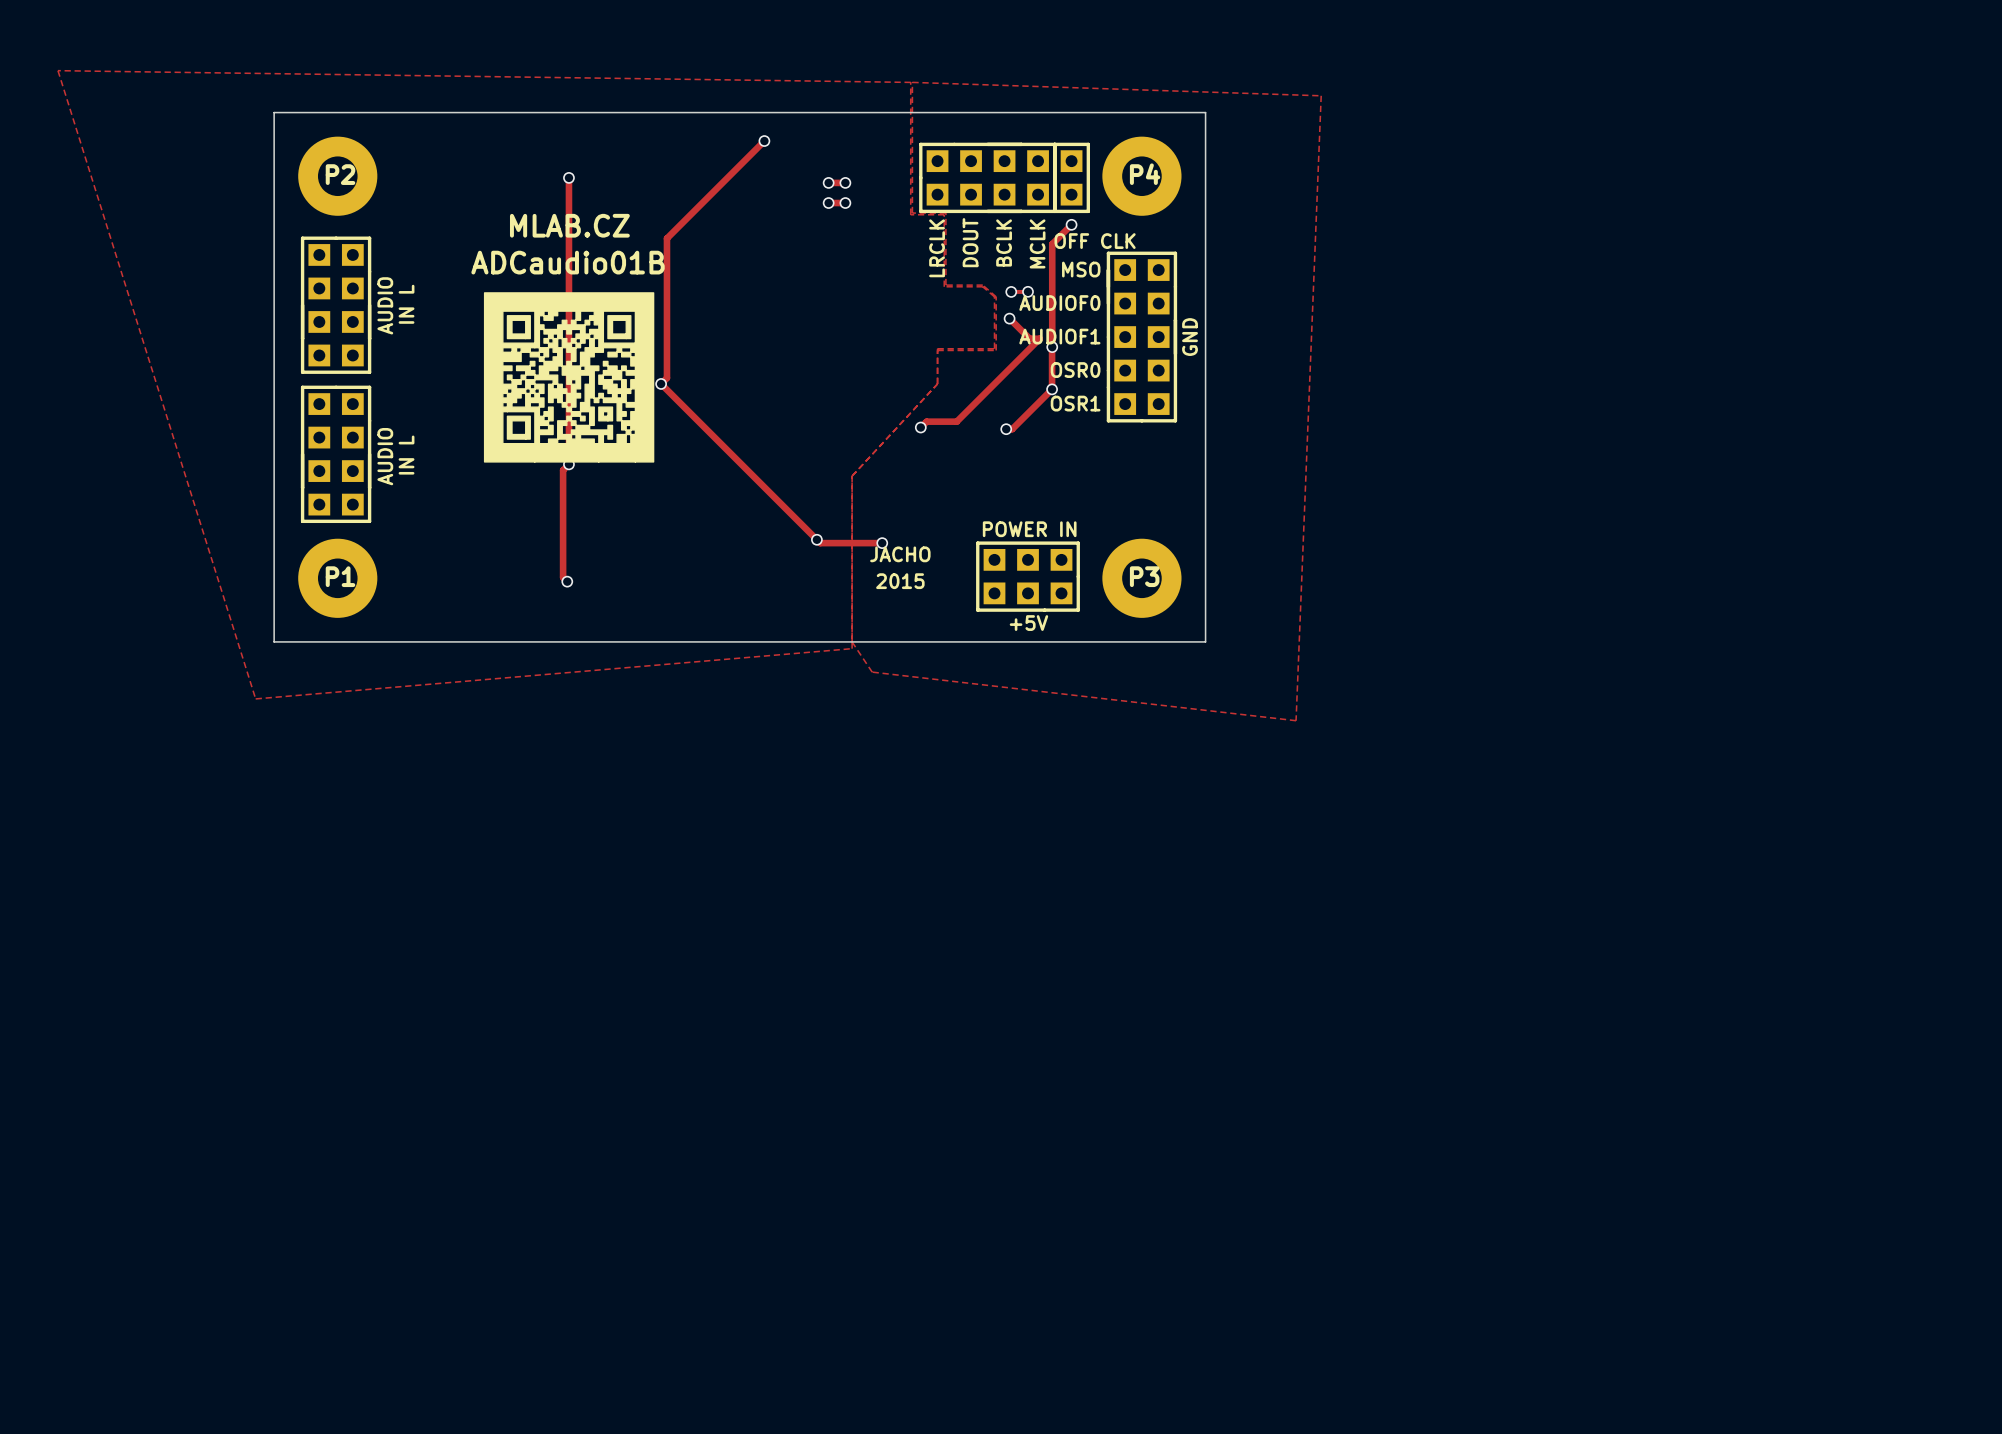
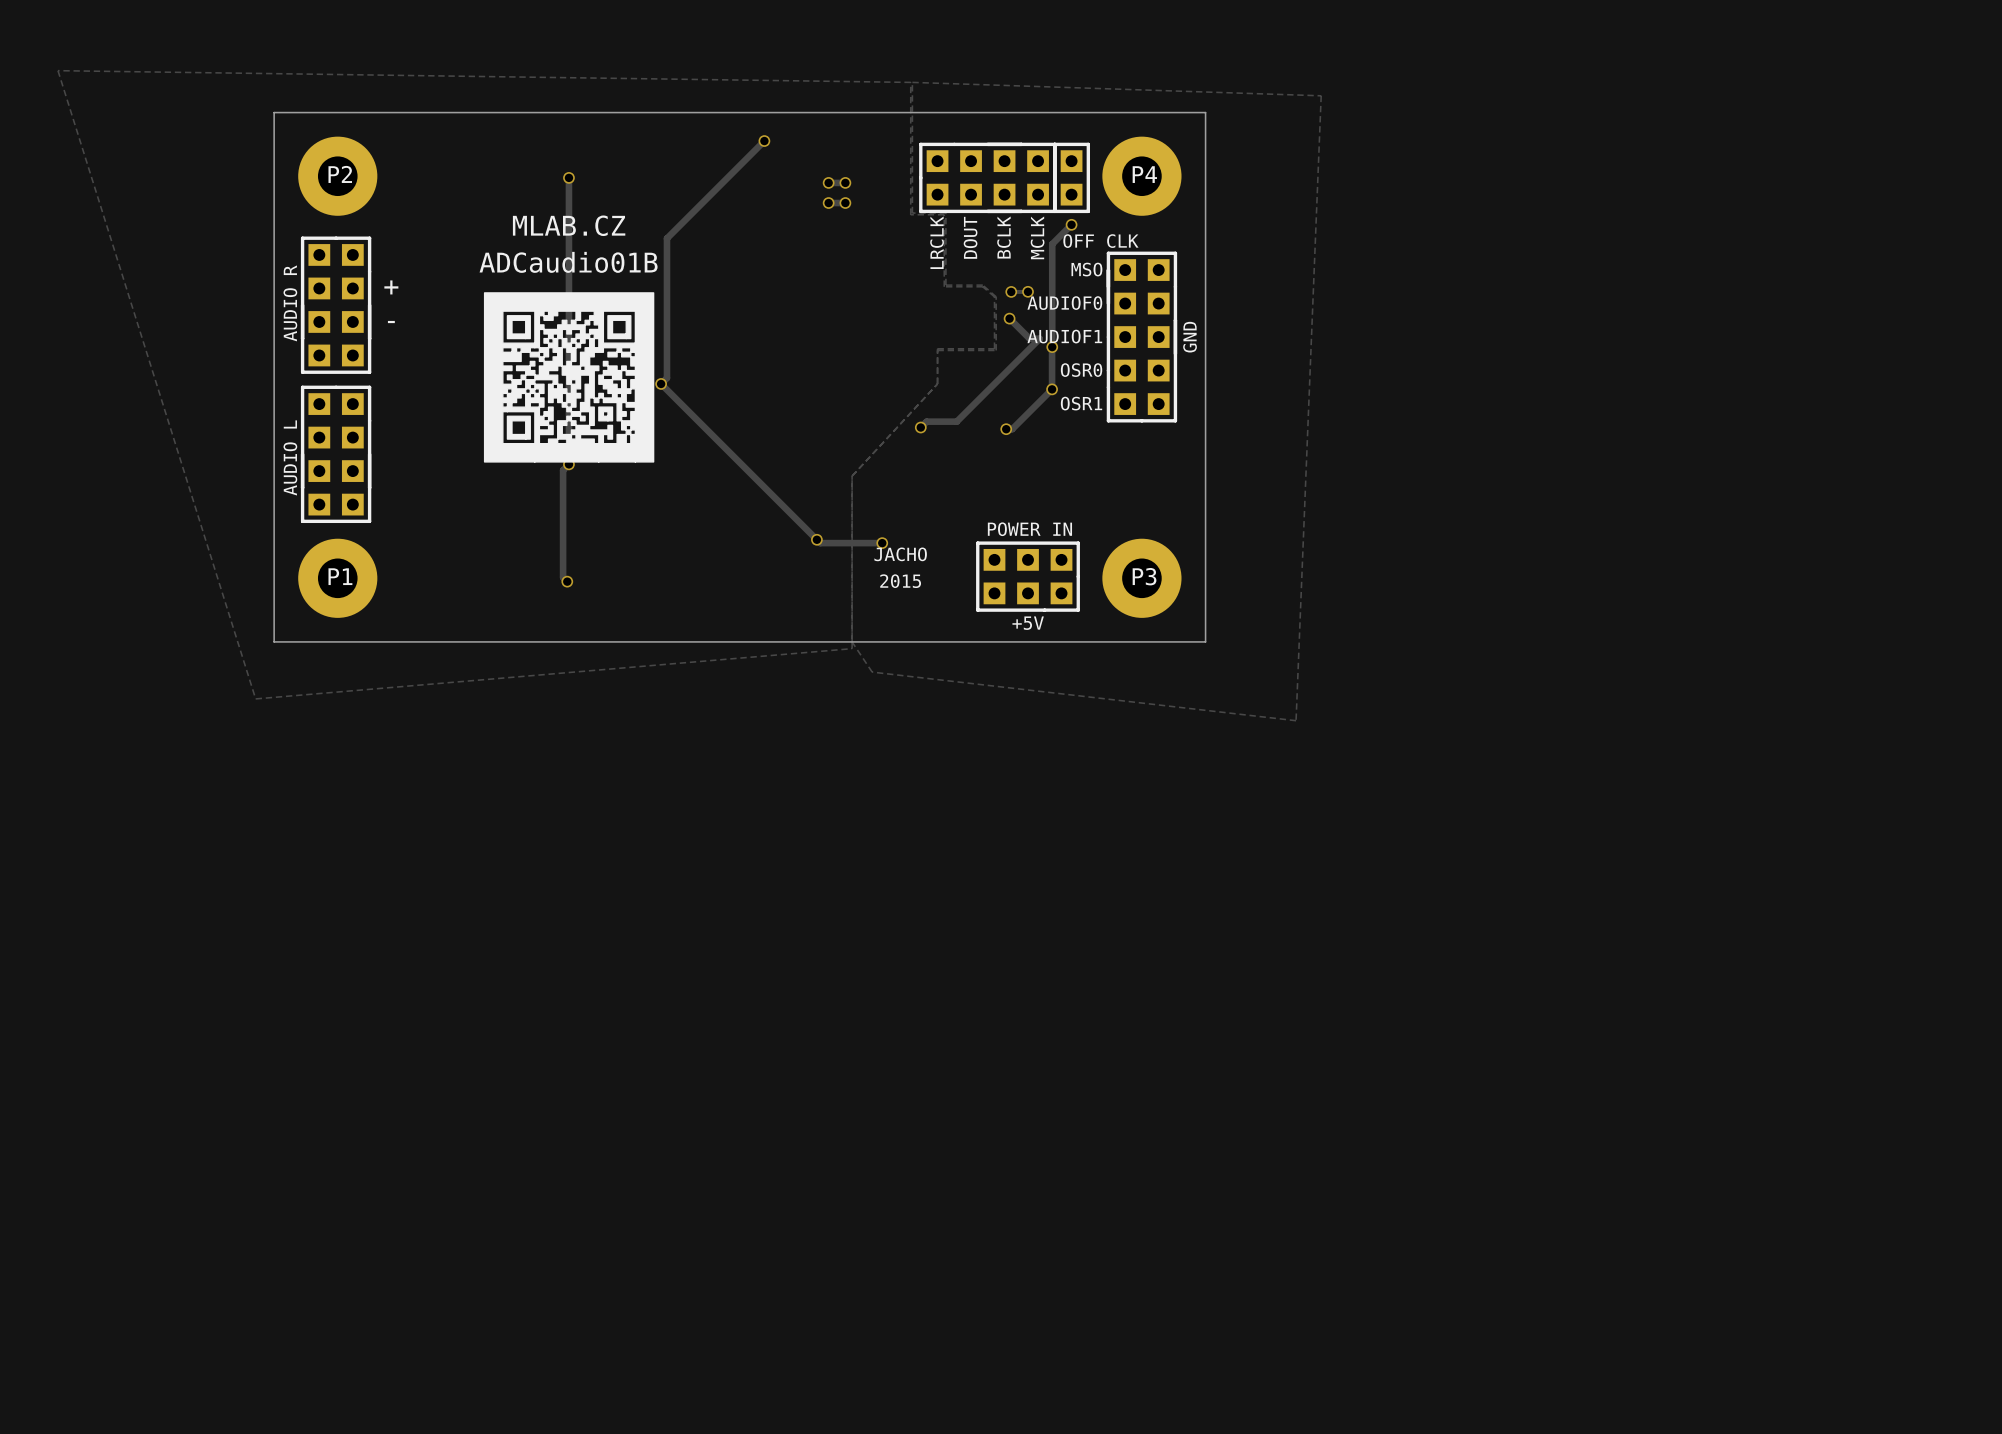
text: none -> + (391, 287)
text: none -> AUDIO R (290, 303)
text: IN L (406, 304) -> none
text: AUDIO (385, 305) -> none
text: none -> - (391, 322)
text: IN L (406, 455) -> none
text: AUDIO (385, 456) -> none
text: none -> AUDIO L (290, 457)

